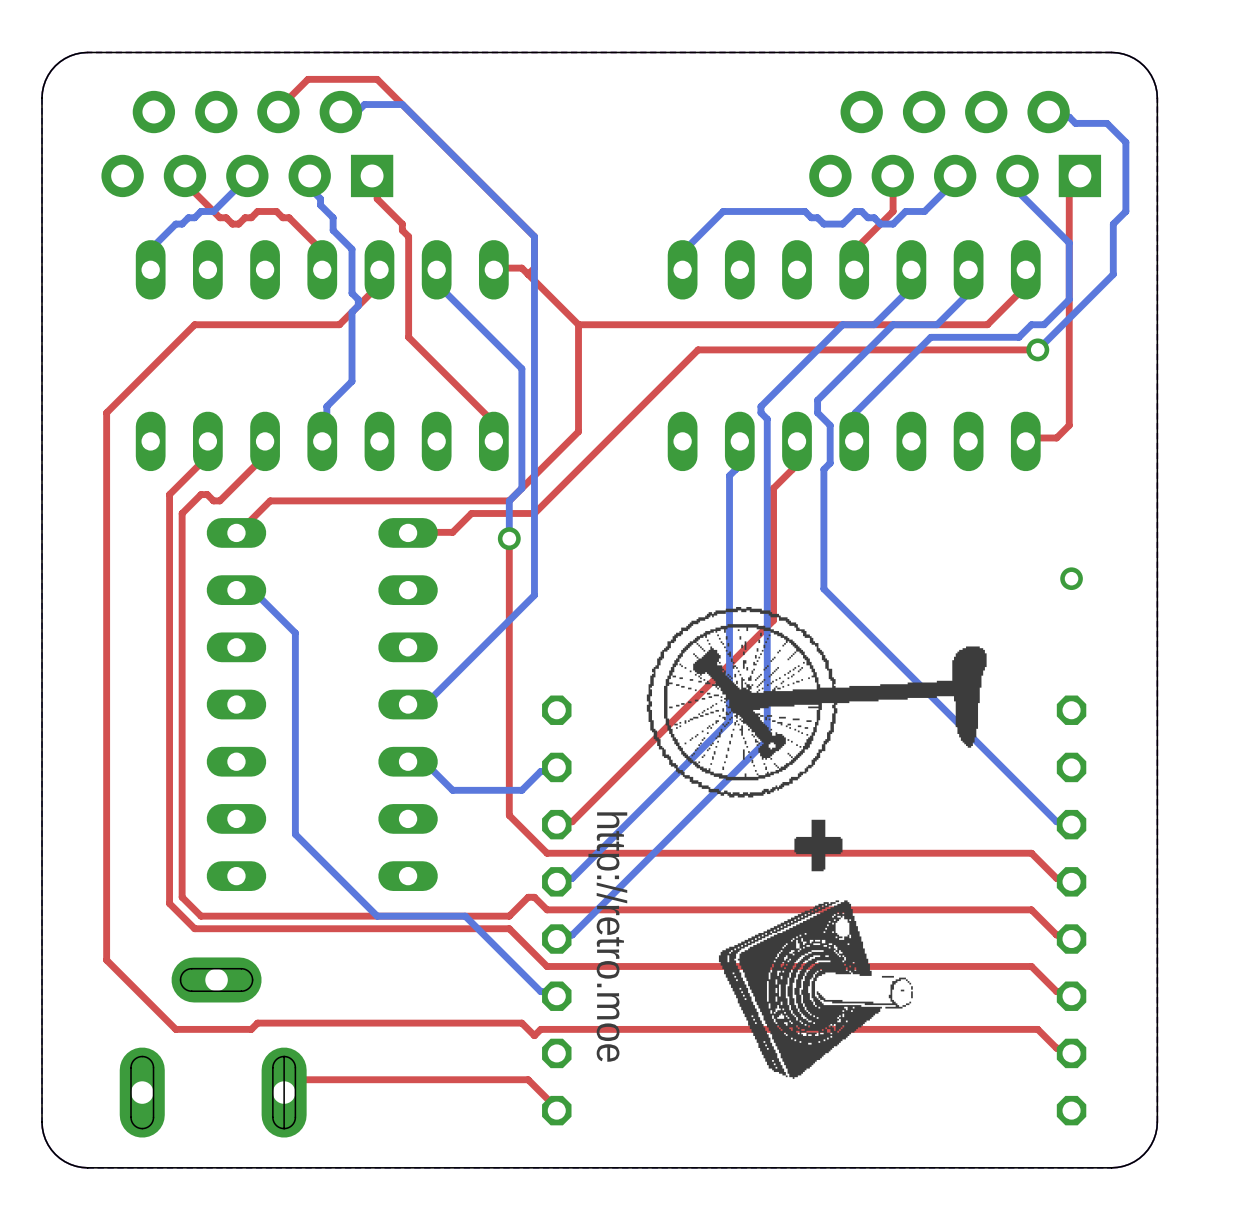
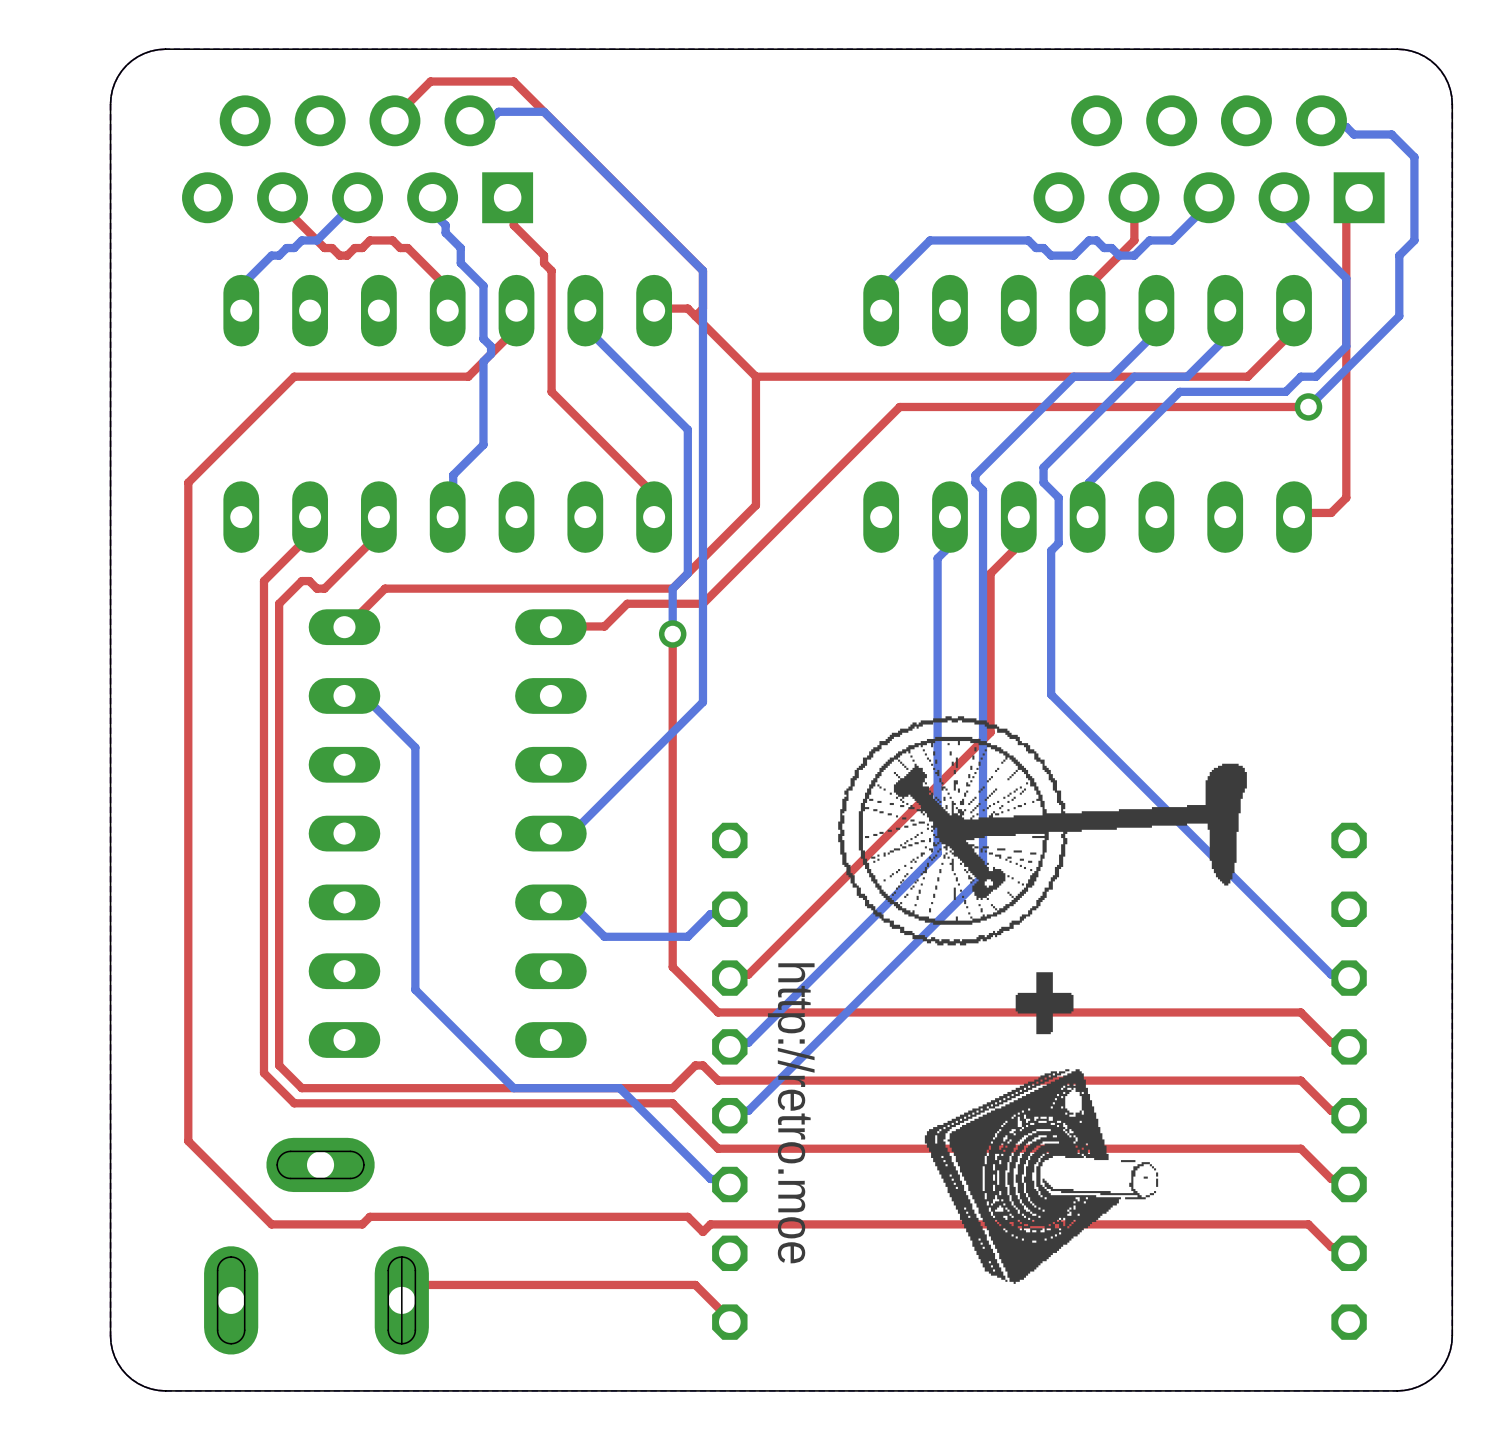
via: (1071, 578) -> none

